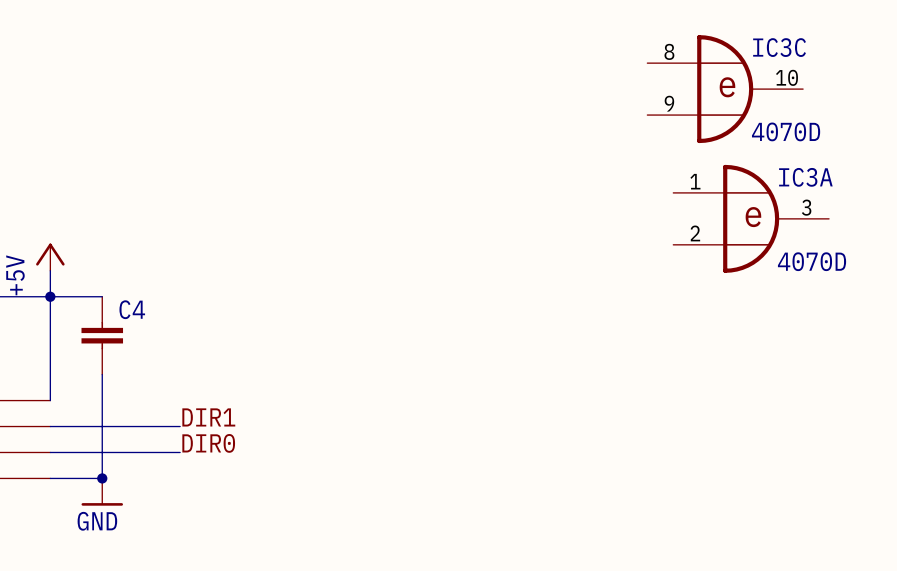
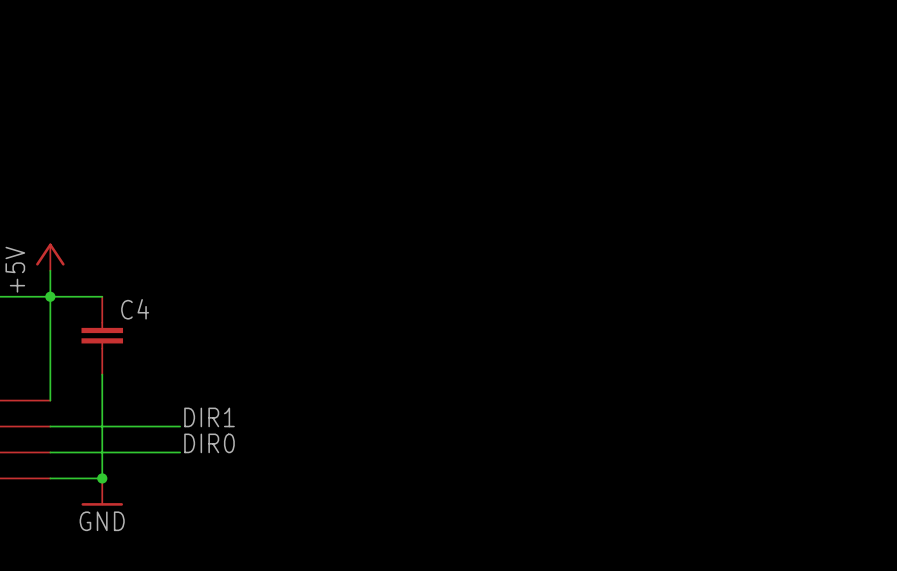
IC3C: 4070D (725, 89) -> none
IC3A: 4070D (751, 218) -> none

